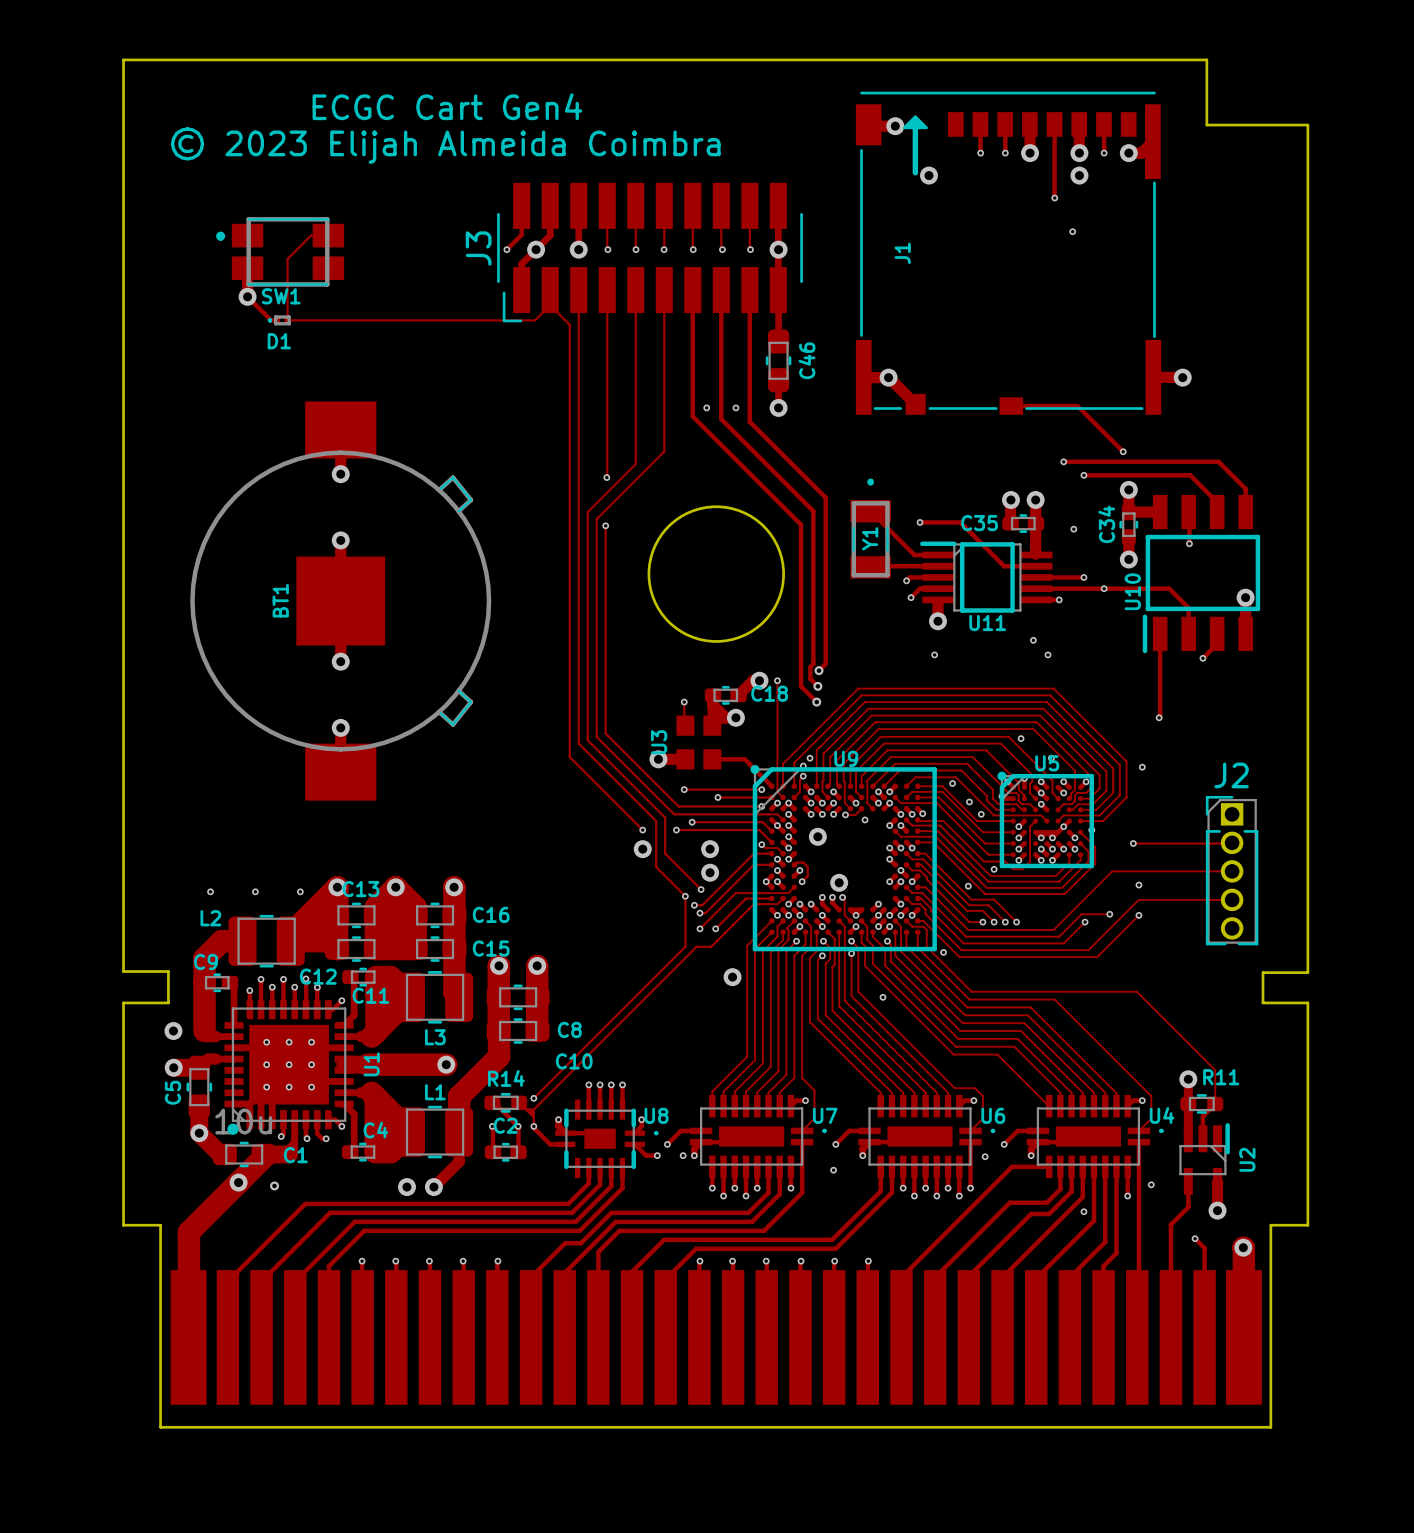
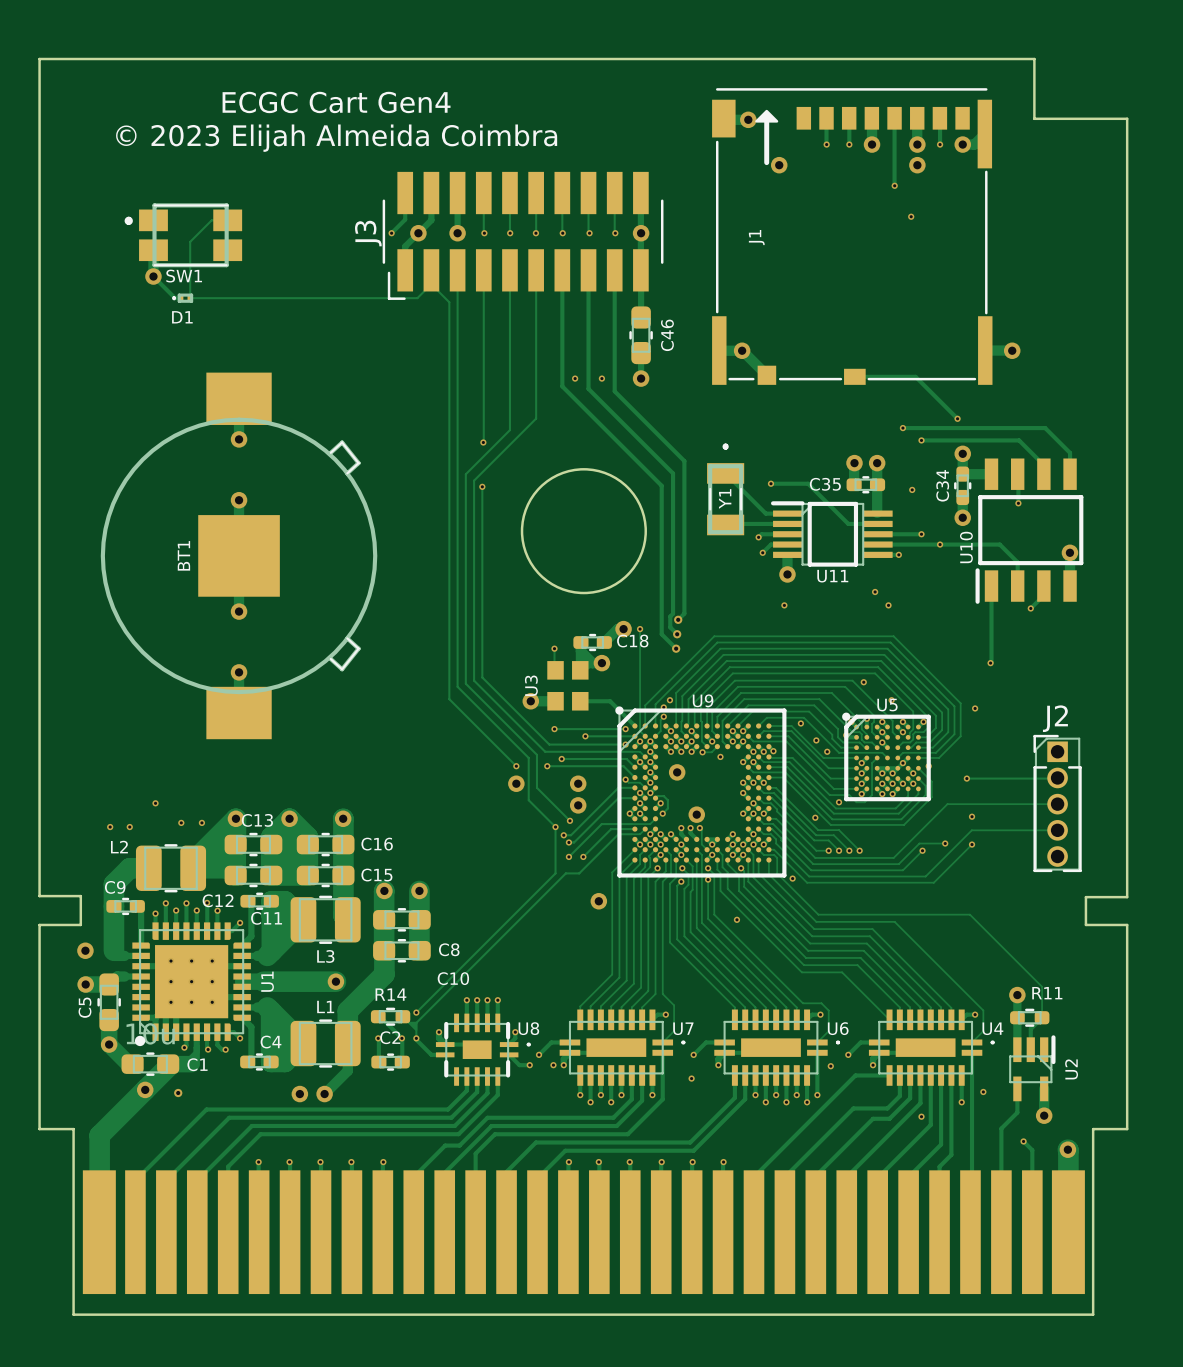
via: none -> (155, 803)
via: (210, 891) -> none
via: (255, 891) -> none
via: none -> (181, 822)
via: none -> (110, 827)
via: none -> (129, 827)

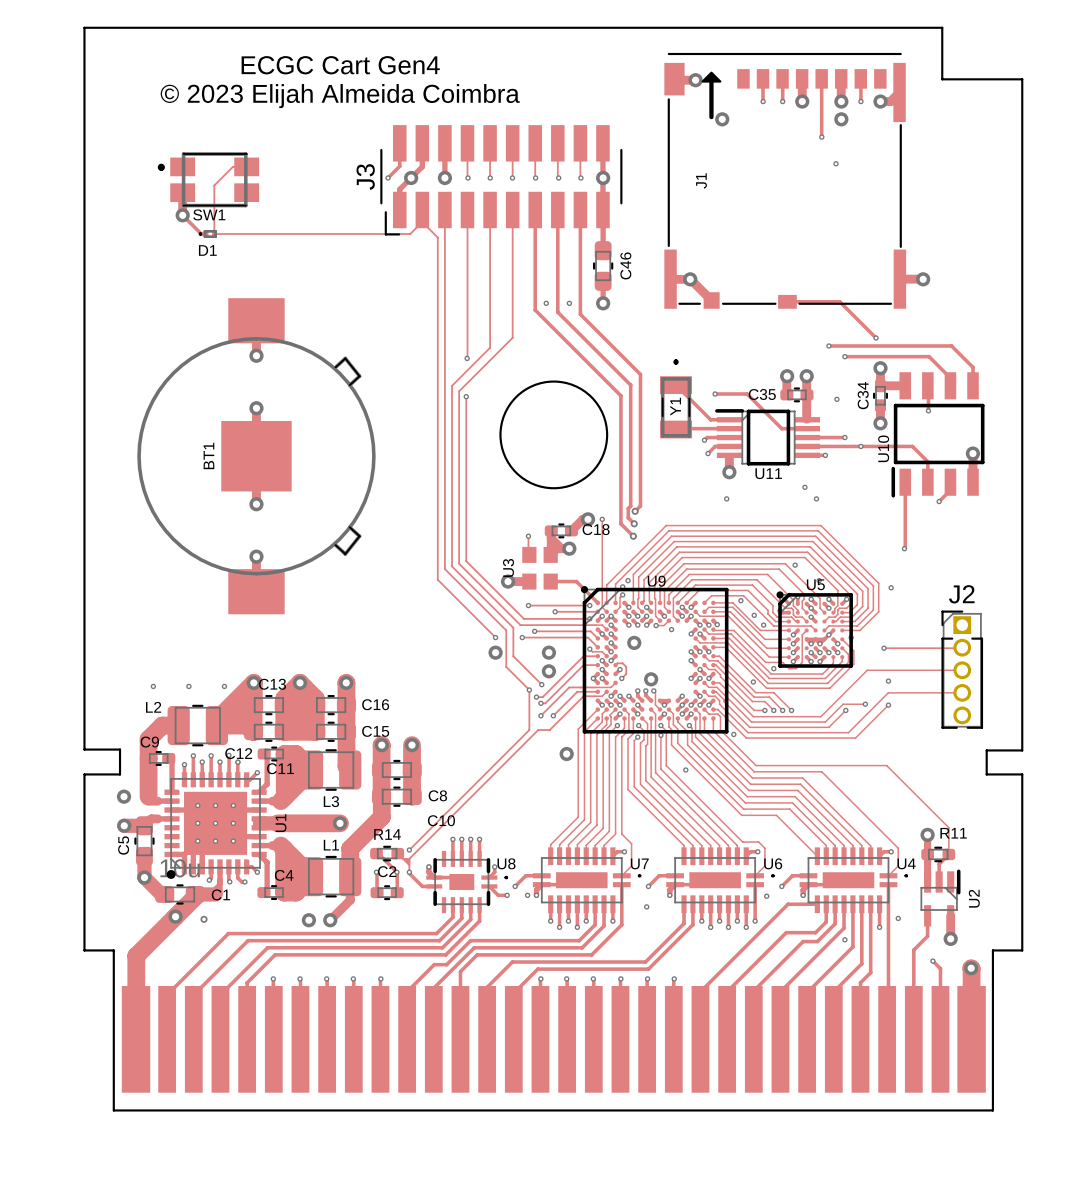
via: (155, 803) -> none
via: none -> (153, 686)
via: none -> (188, 686)
via: (181, 822) -> none
via: (110, 827) -> none
via: (129, 827) -> none

